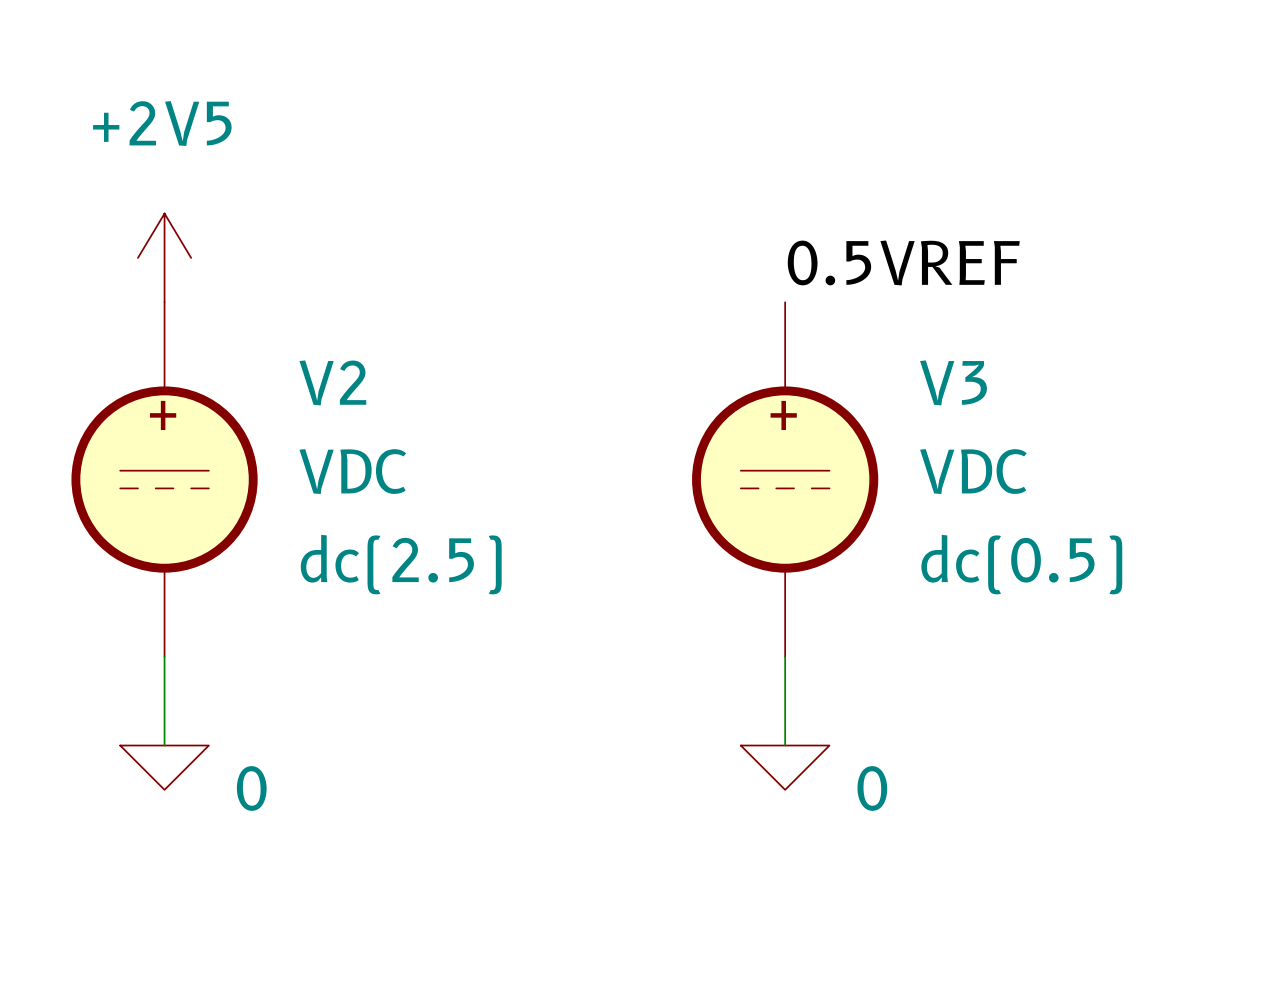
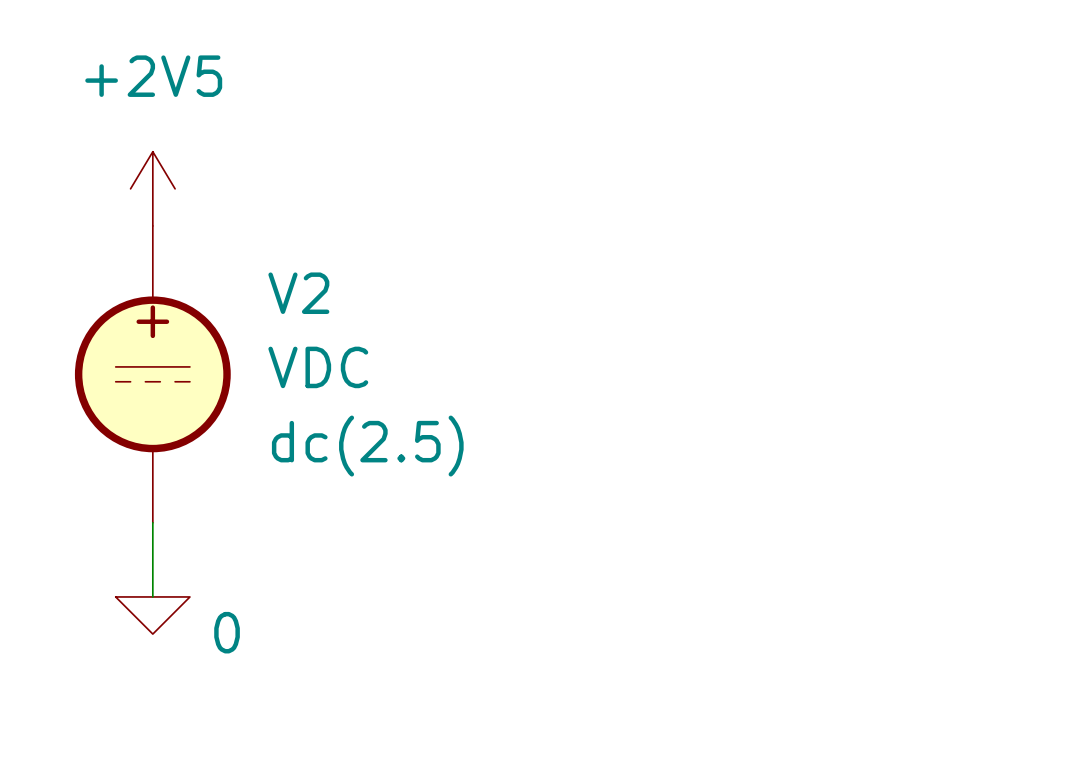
label: 0.5VREF (903, 262) -> none
V3: VDC (785, 479) -> none
wire: (785, 656) (785, 745) -> none
power symbol: 0 (785, 767) -> none

